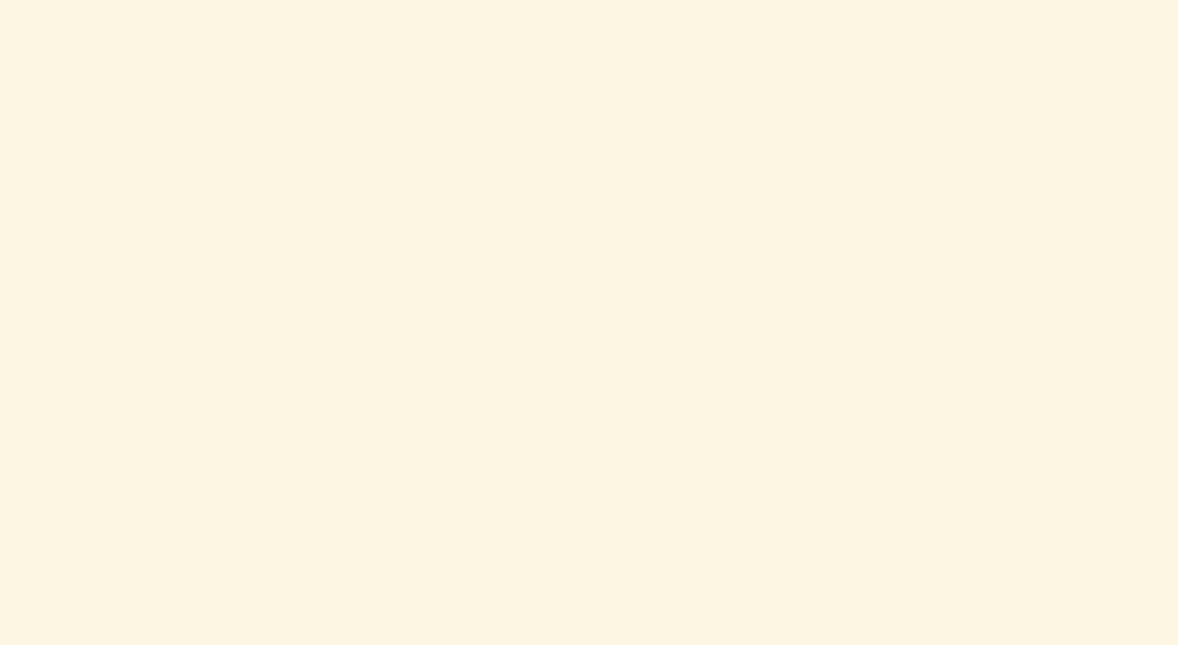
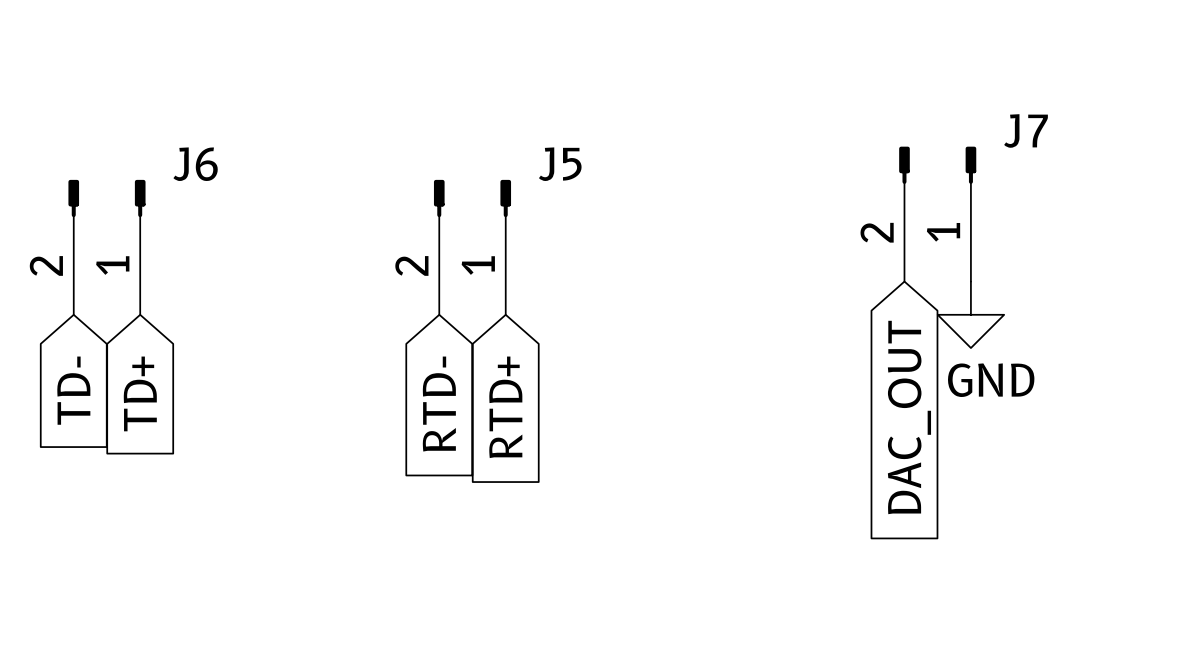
J7: none -> (937, 214)
J6: none -> (106, 247)
J5: none -> (472, 247)
power symbol: none -> GND (970, 314)
global label: none -> TD- (73, 390)
global label: none -> TD+ (140, 393)
global label: none -> RTD- (439, 404)
global label: none -> RTD+ (505, 407)
global label: none -> DAC_OUT (909, 417)

